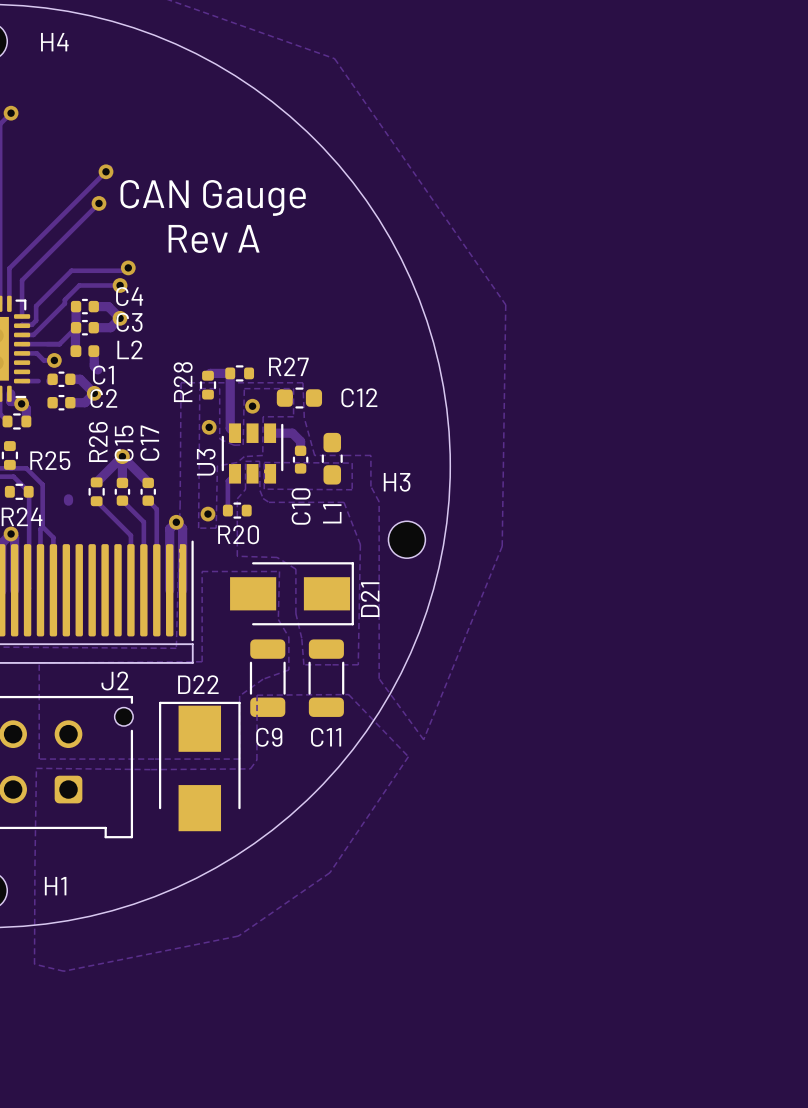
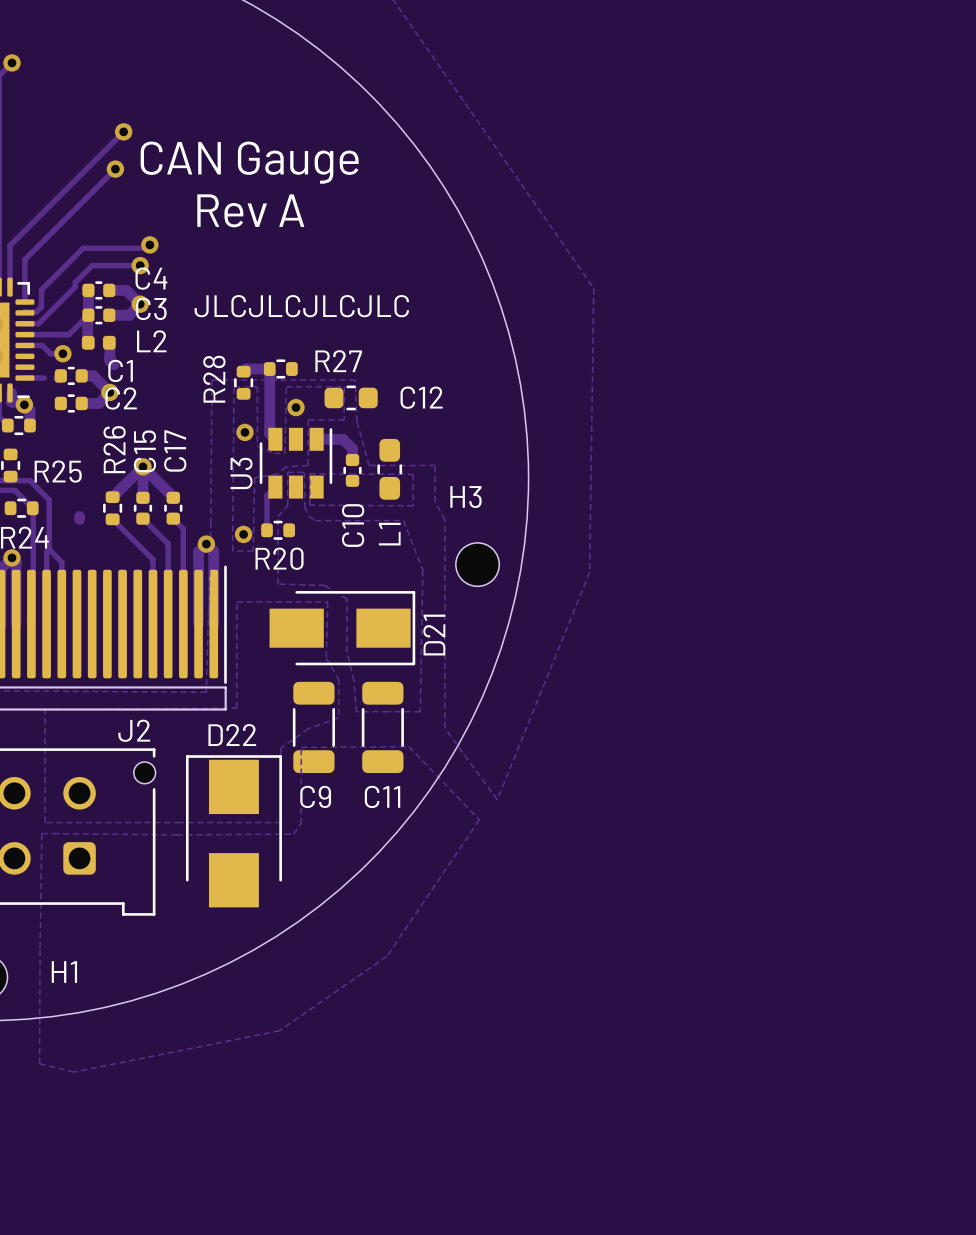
text: none -> JLCJLCJLCJLC (301, 306)

